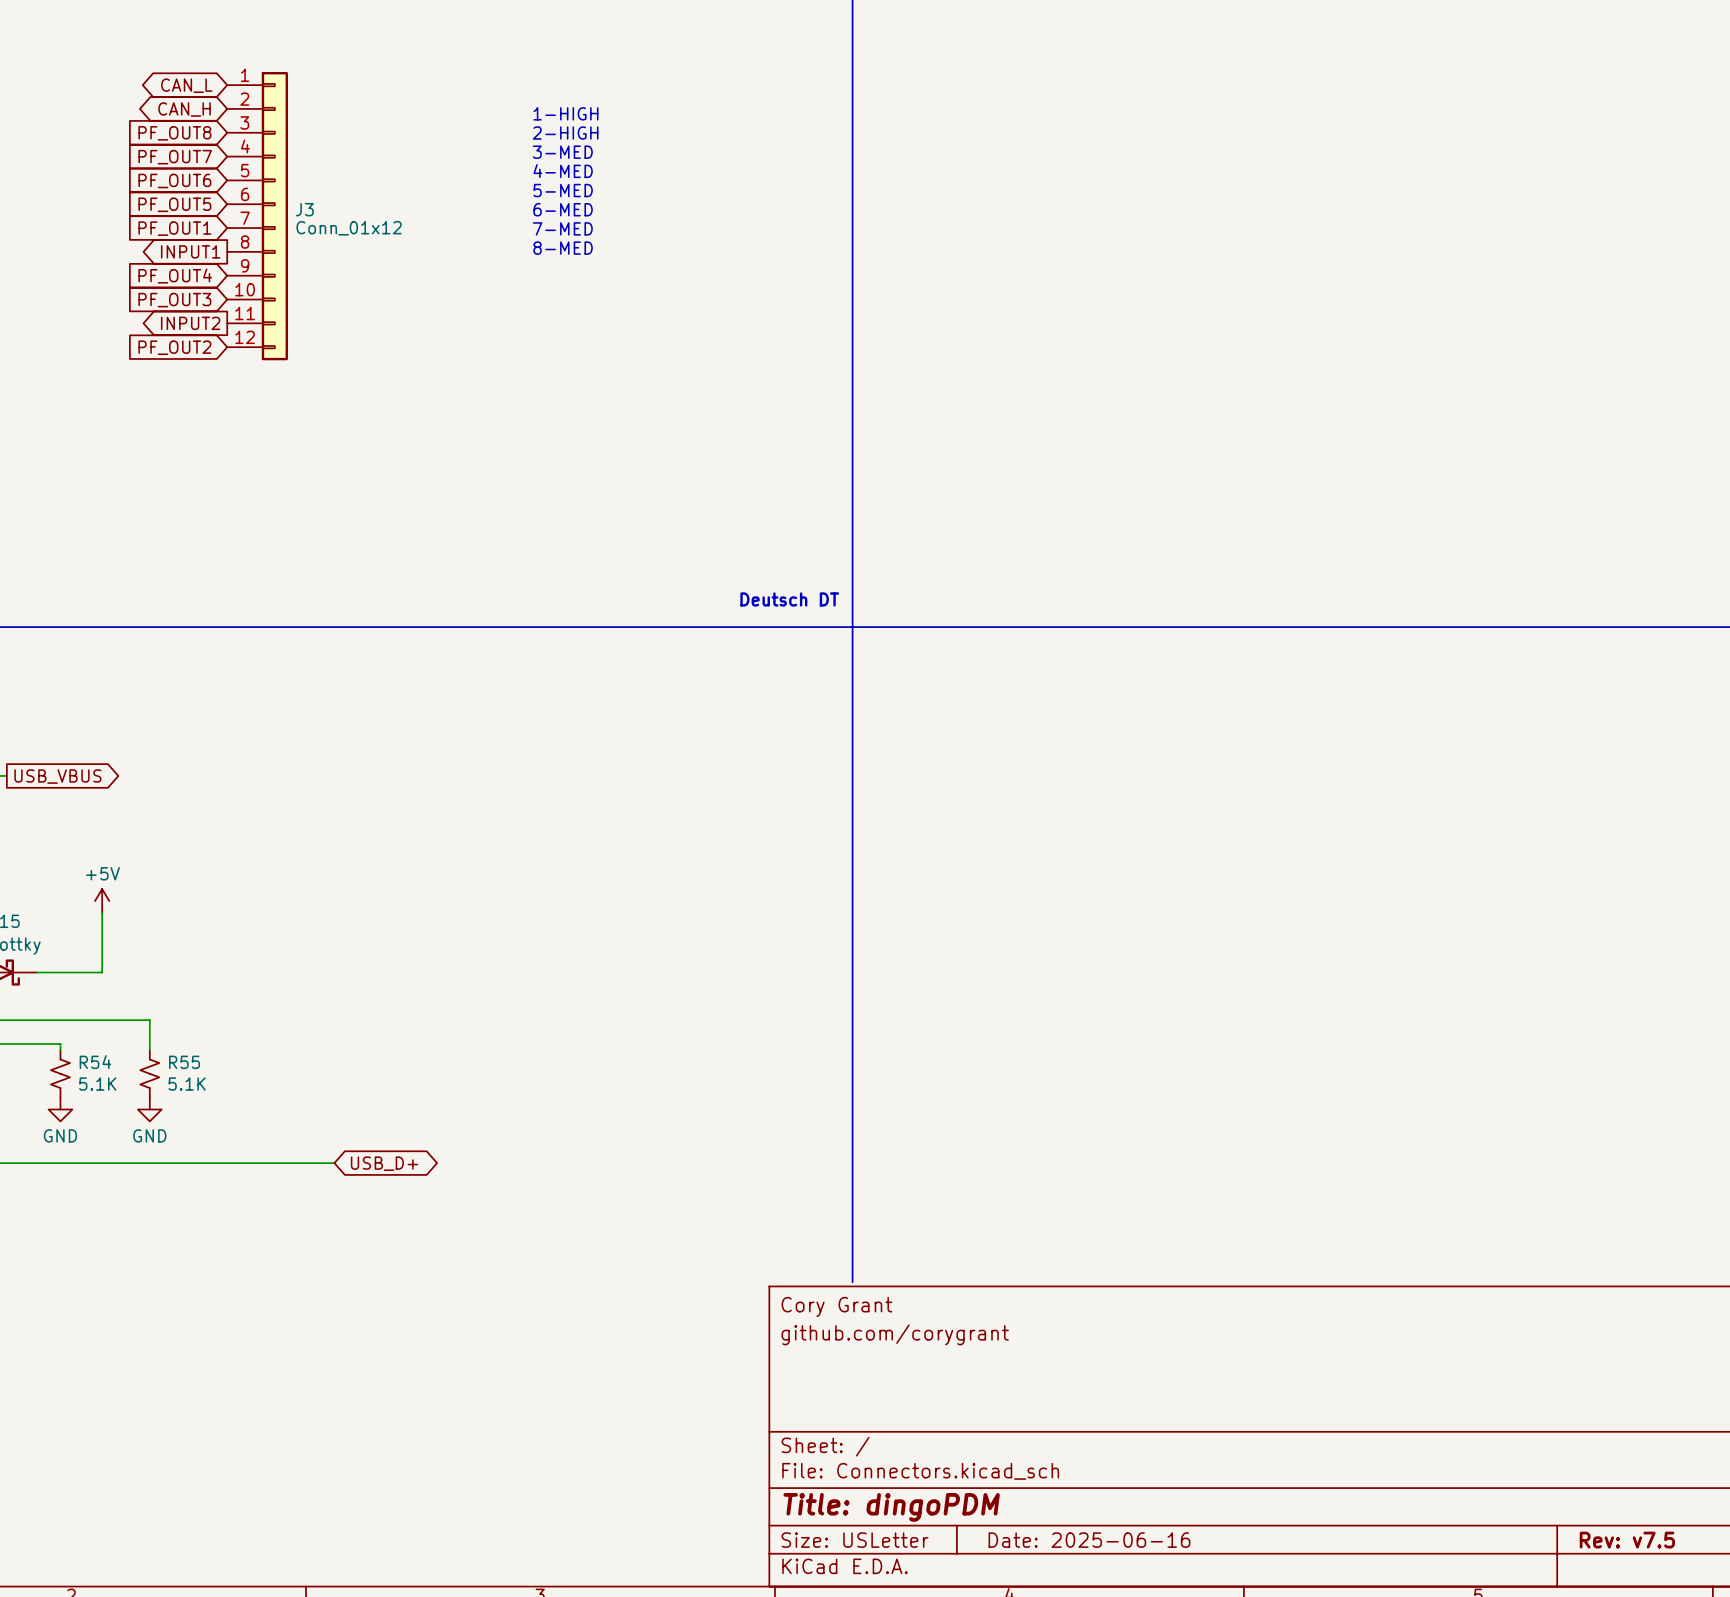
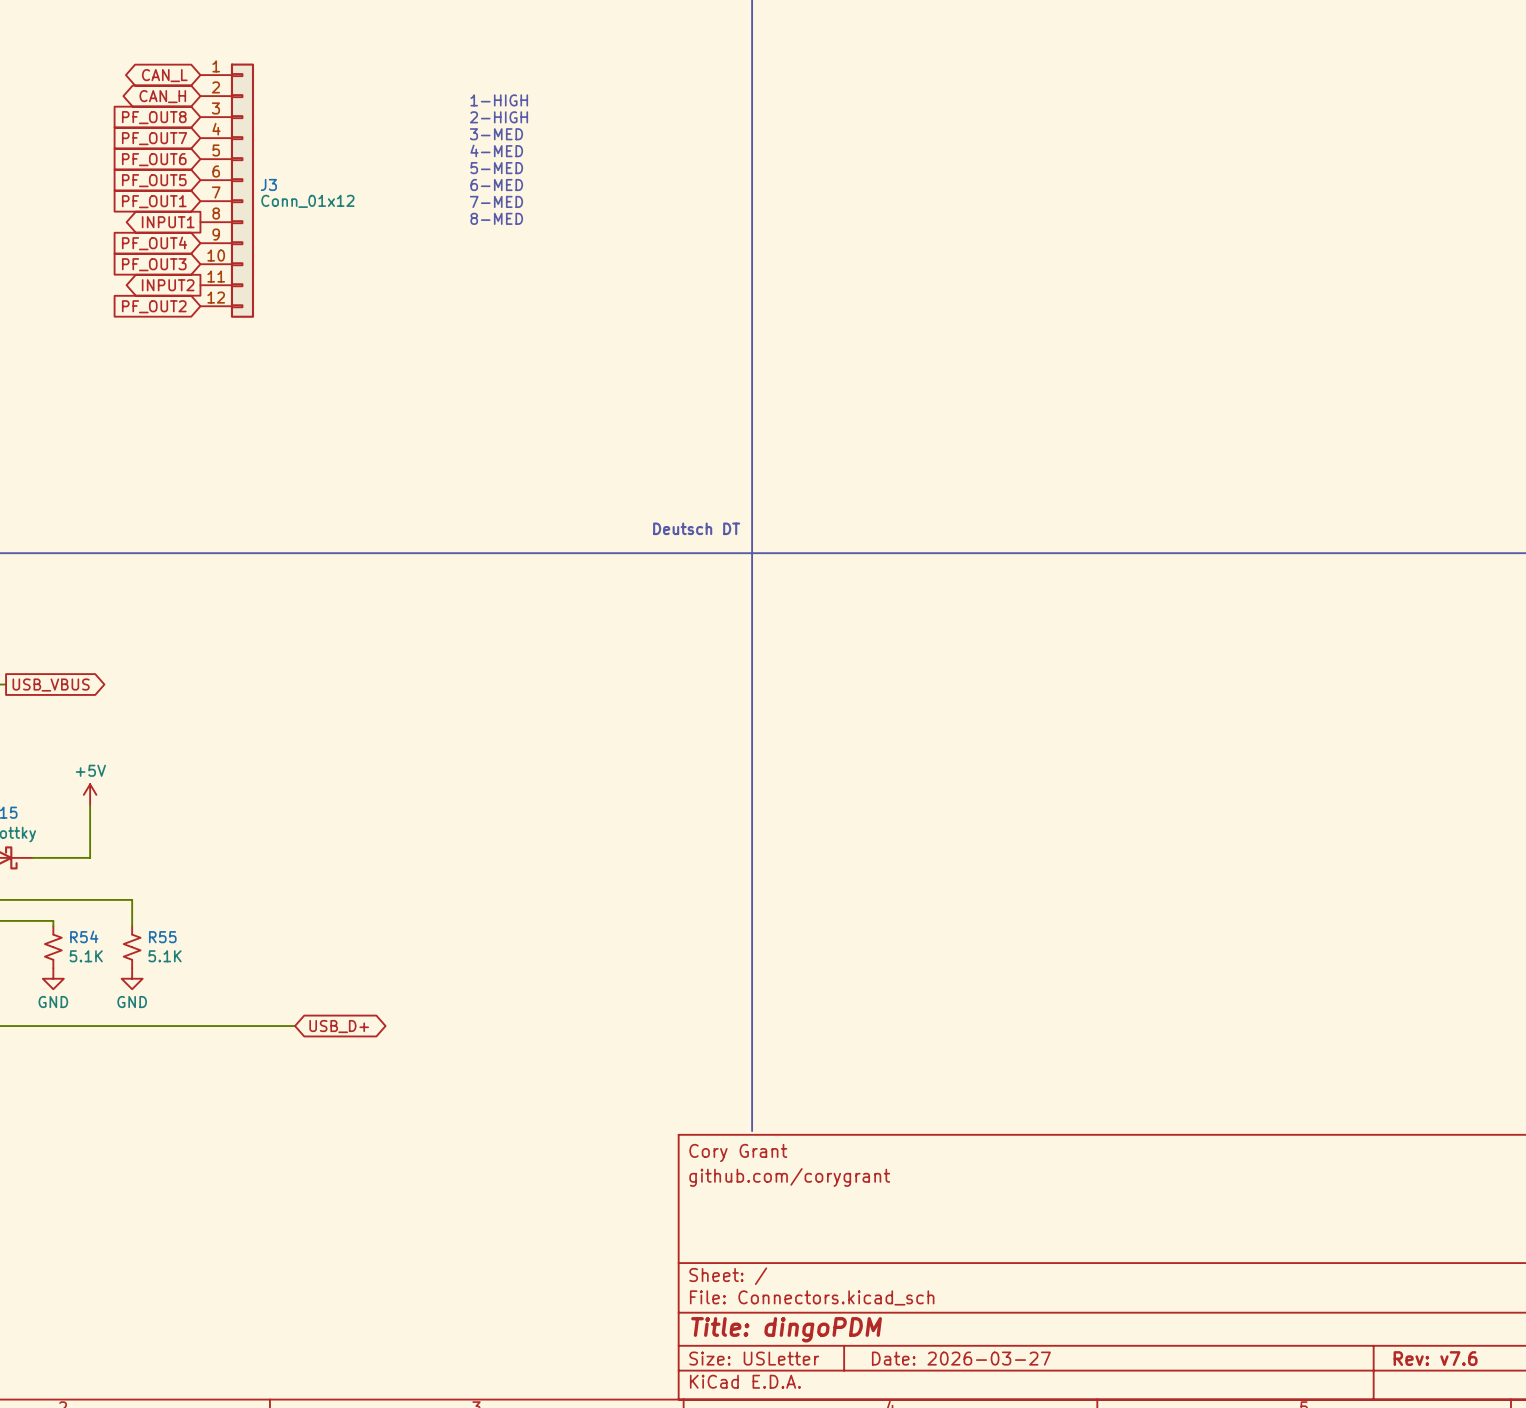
title block: Date: 2025-06-16 (1089, 1540) -> Date: 2026-03-27 (961, 1358)
title block: Rev: v7.5 (1627, 1540) -> Rev: v7.6 (1435, 1358)

